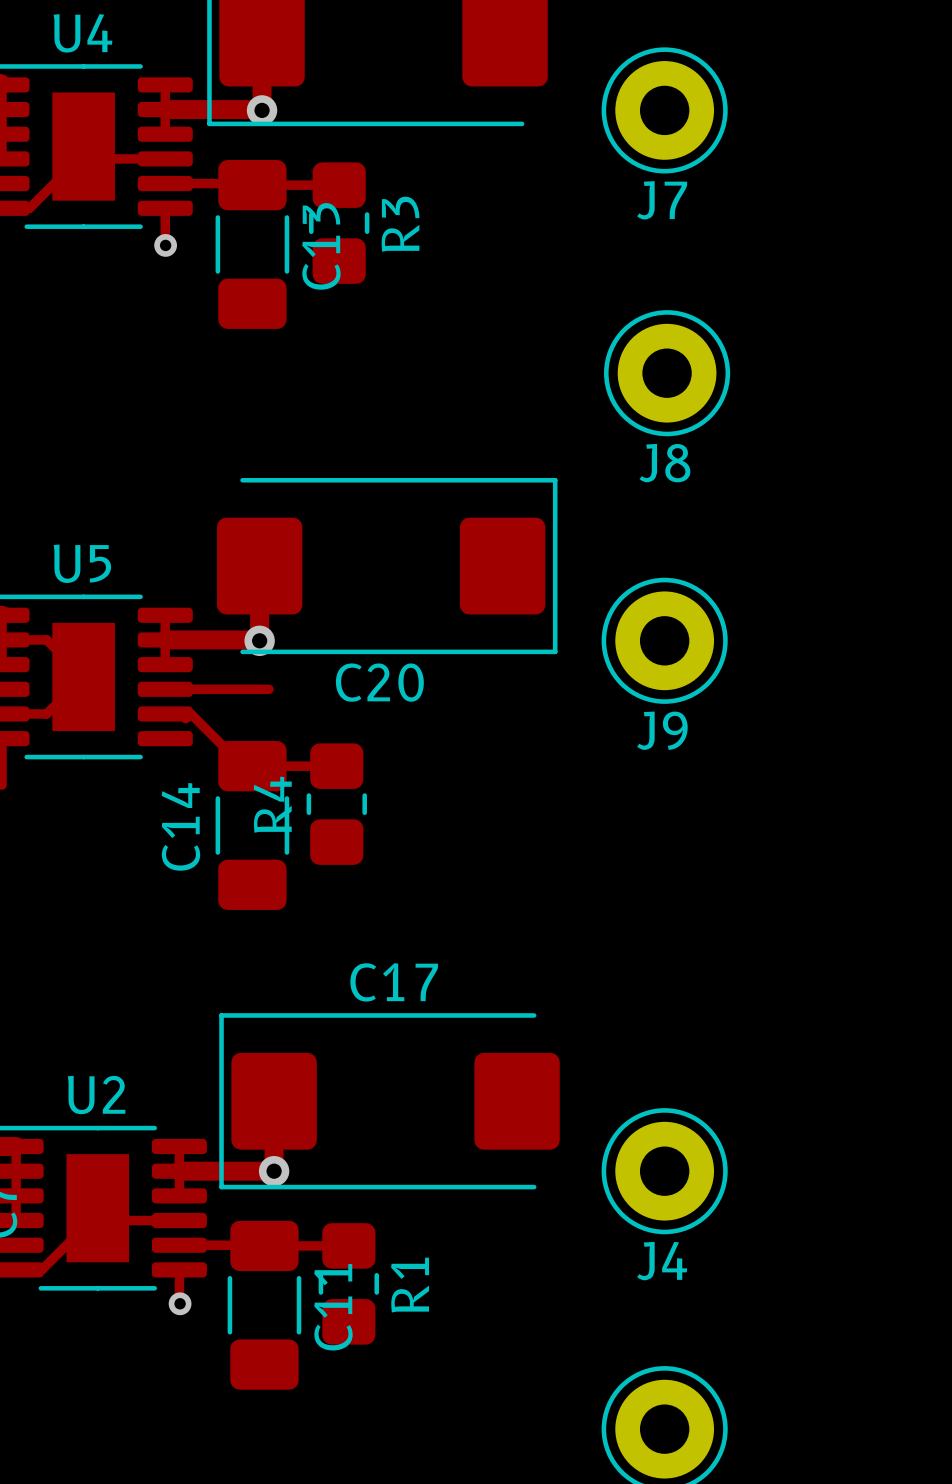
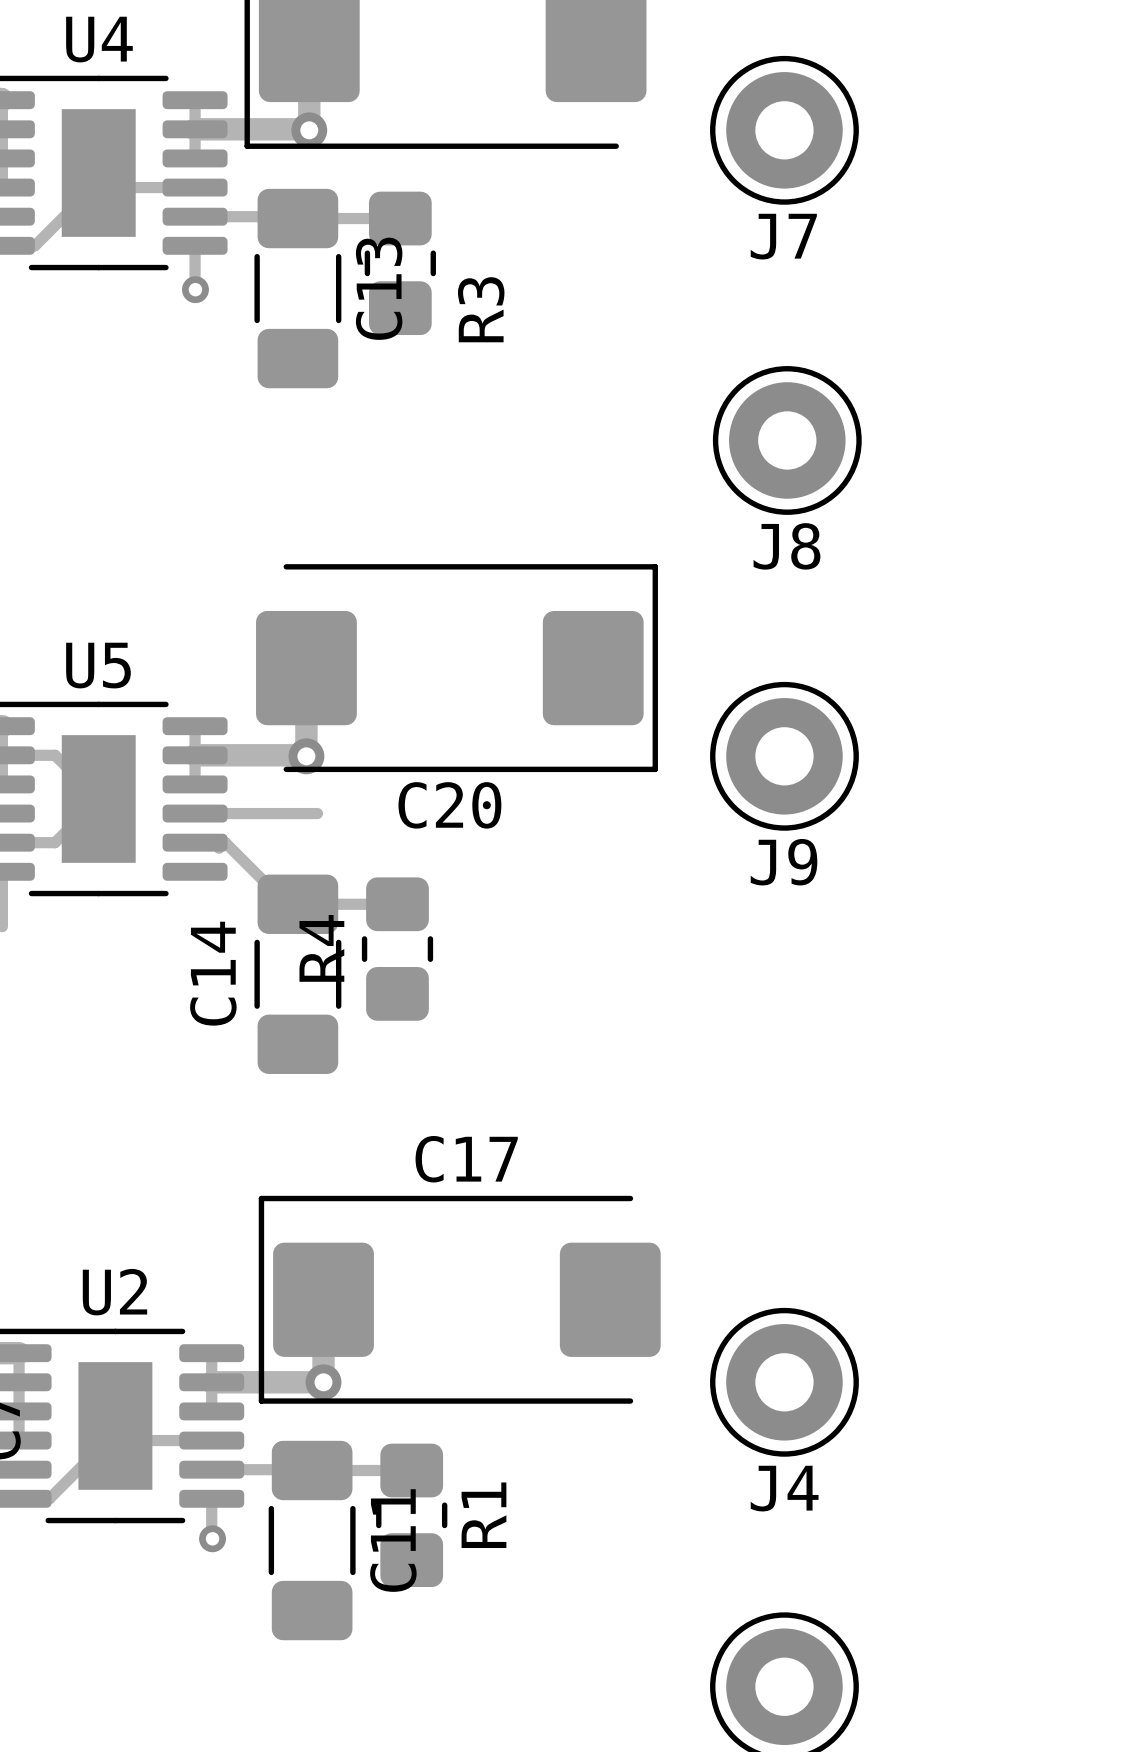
R3 name position: R3 (400, 224) -> R3 (481, 309)

